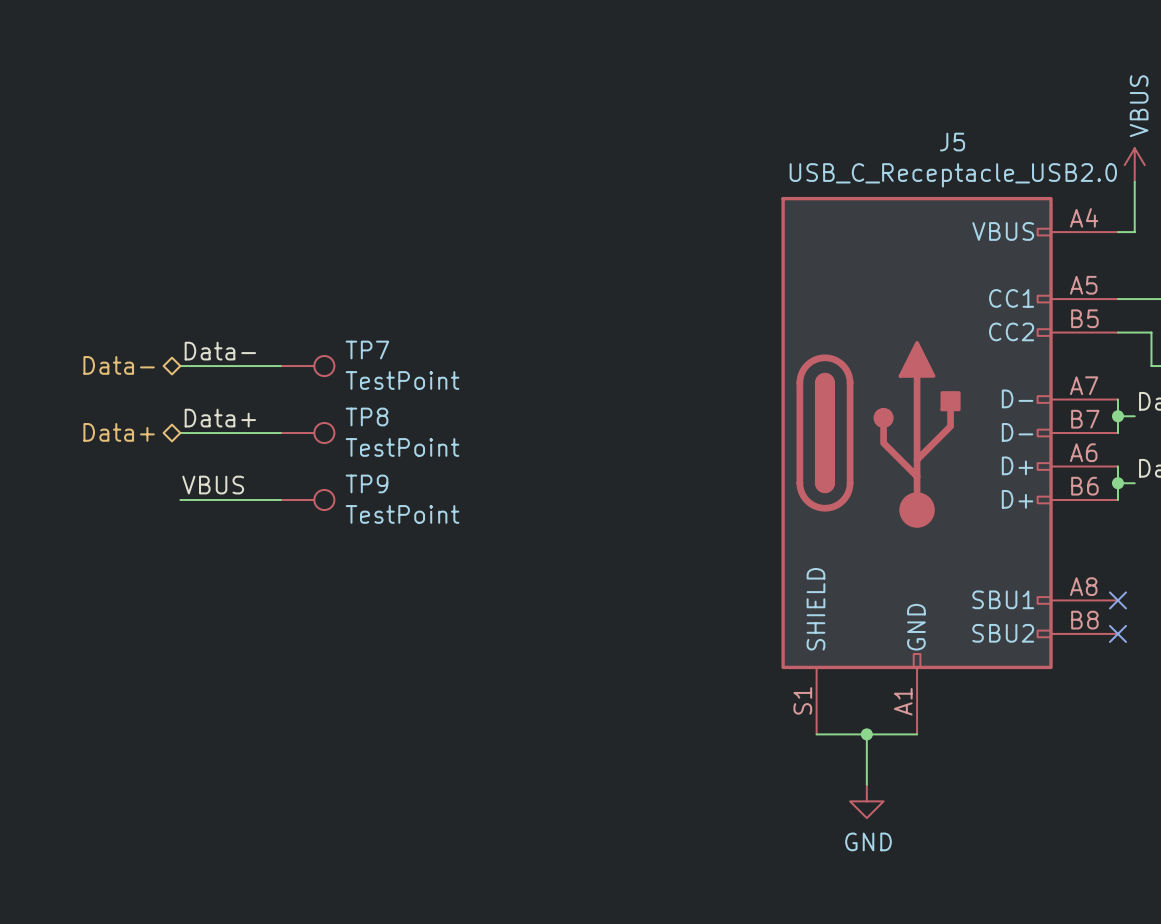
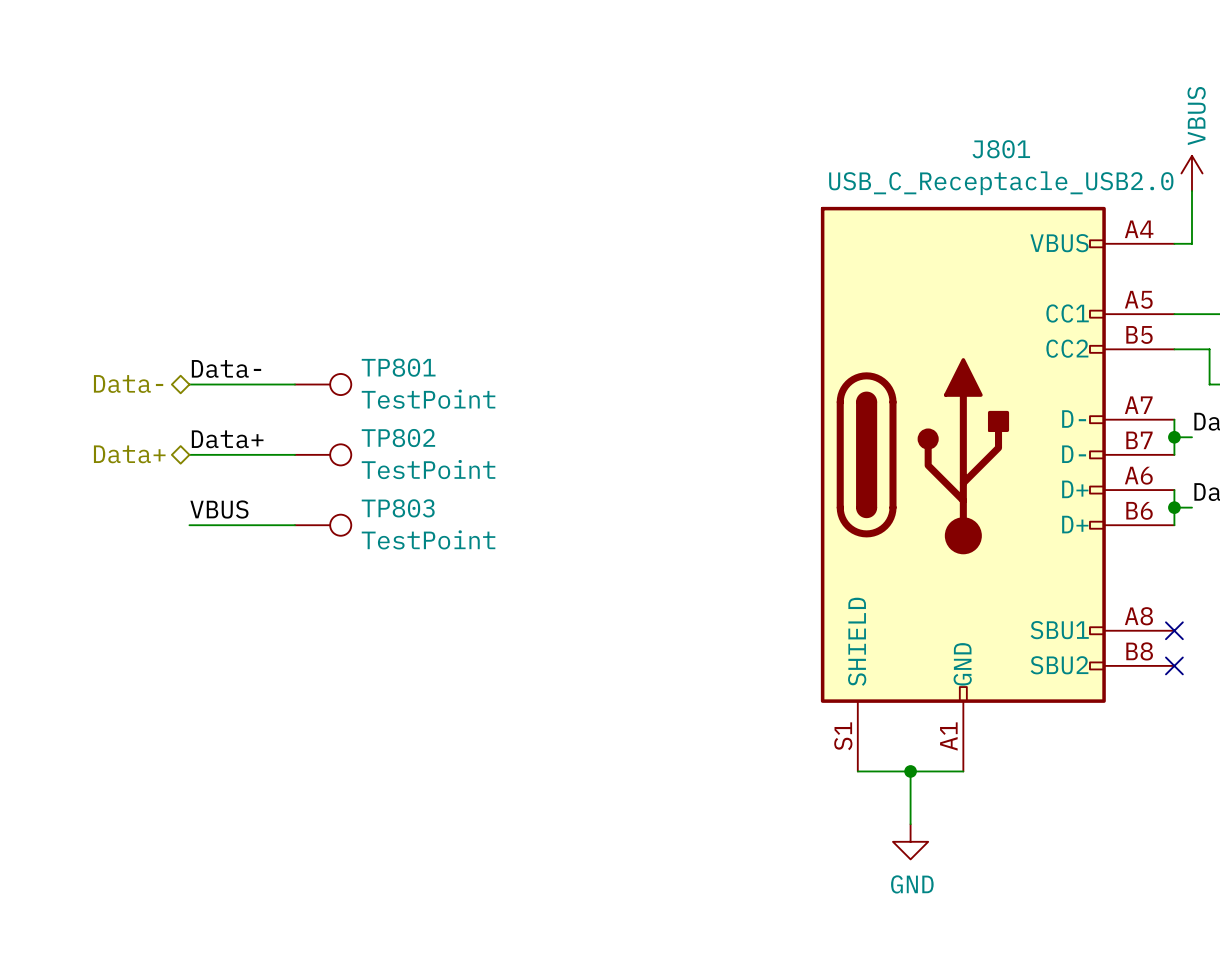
J5 name: J5 (952, 142) -> J801 (1001, 149)
TP7 name: TP7 (367, 350) -> TP801 (398, 367)
TP8 name: TP8 (367, 416) -> TP802 (398, 438)
TP9 name: TP9 (367, 483) -> TP803 (398, 508)

